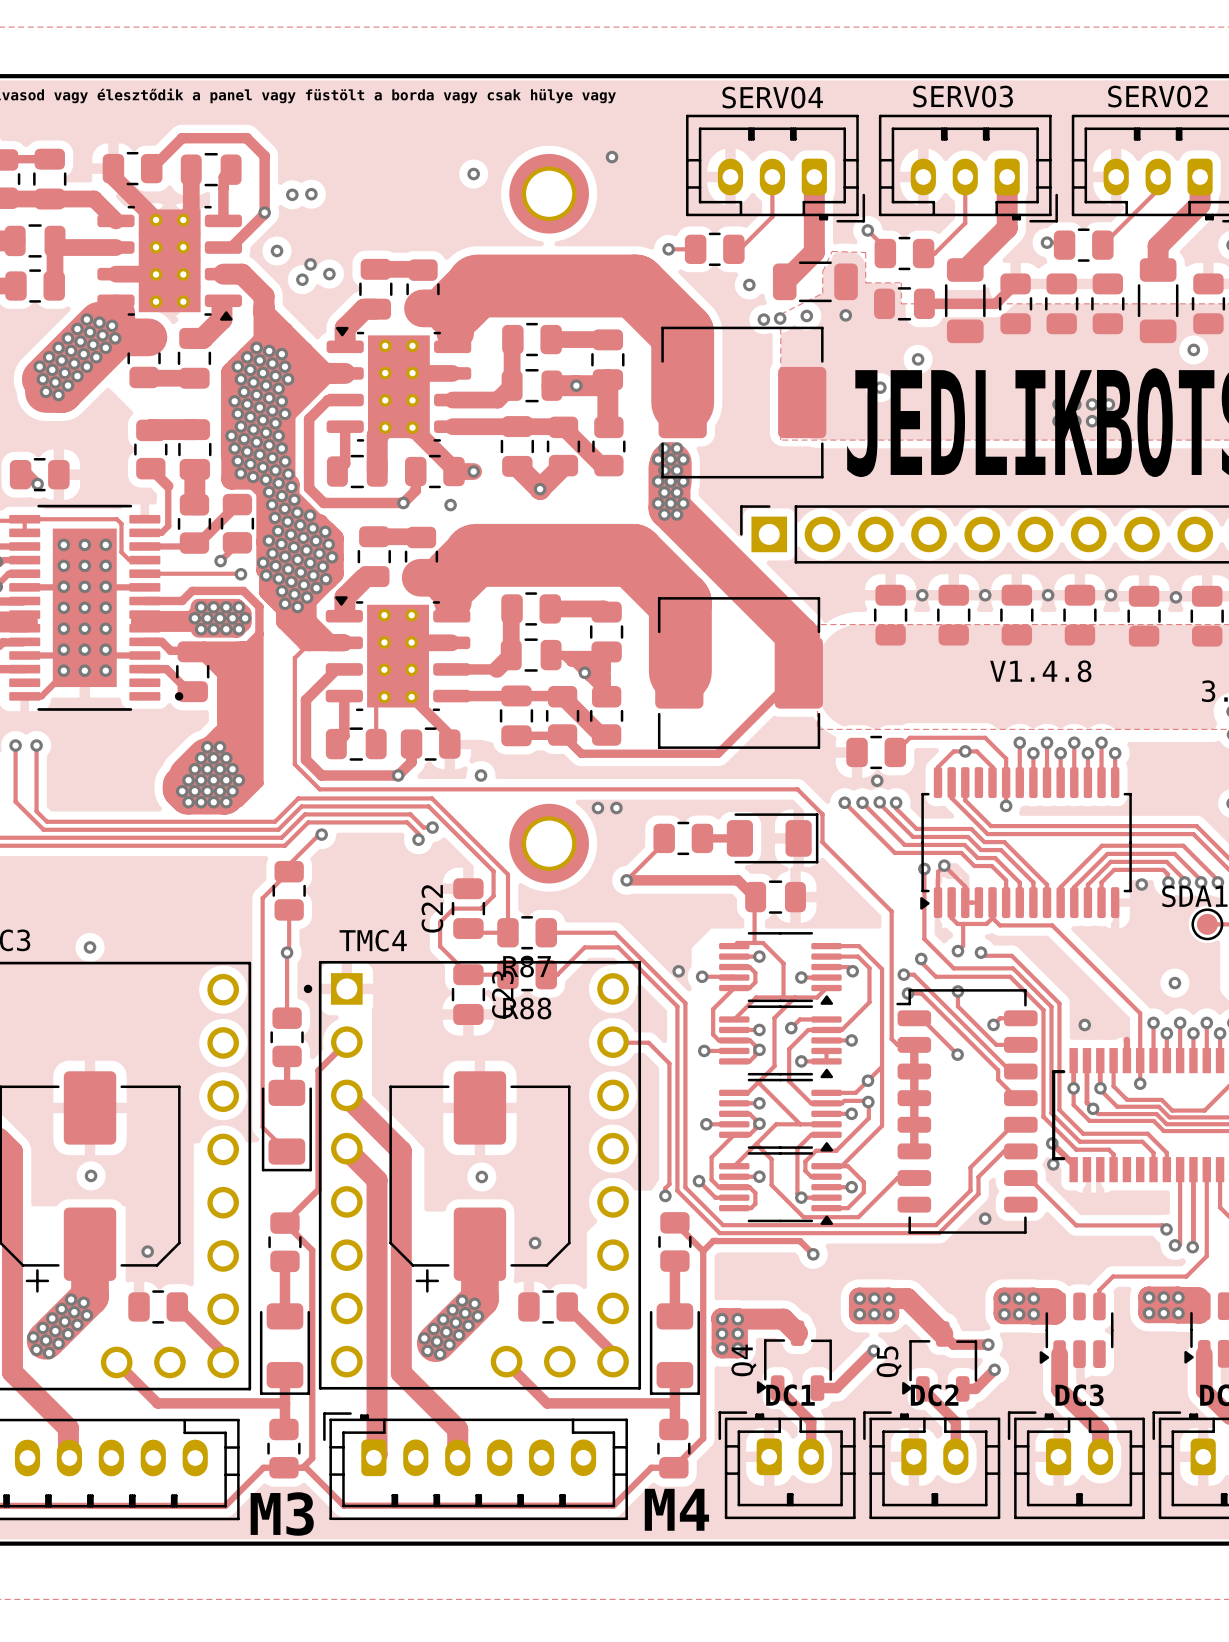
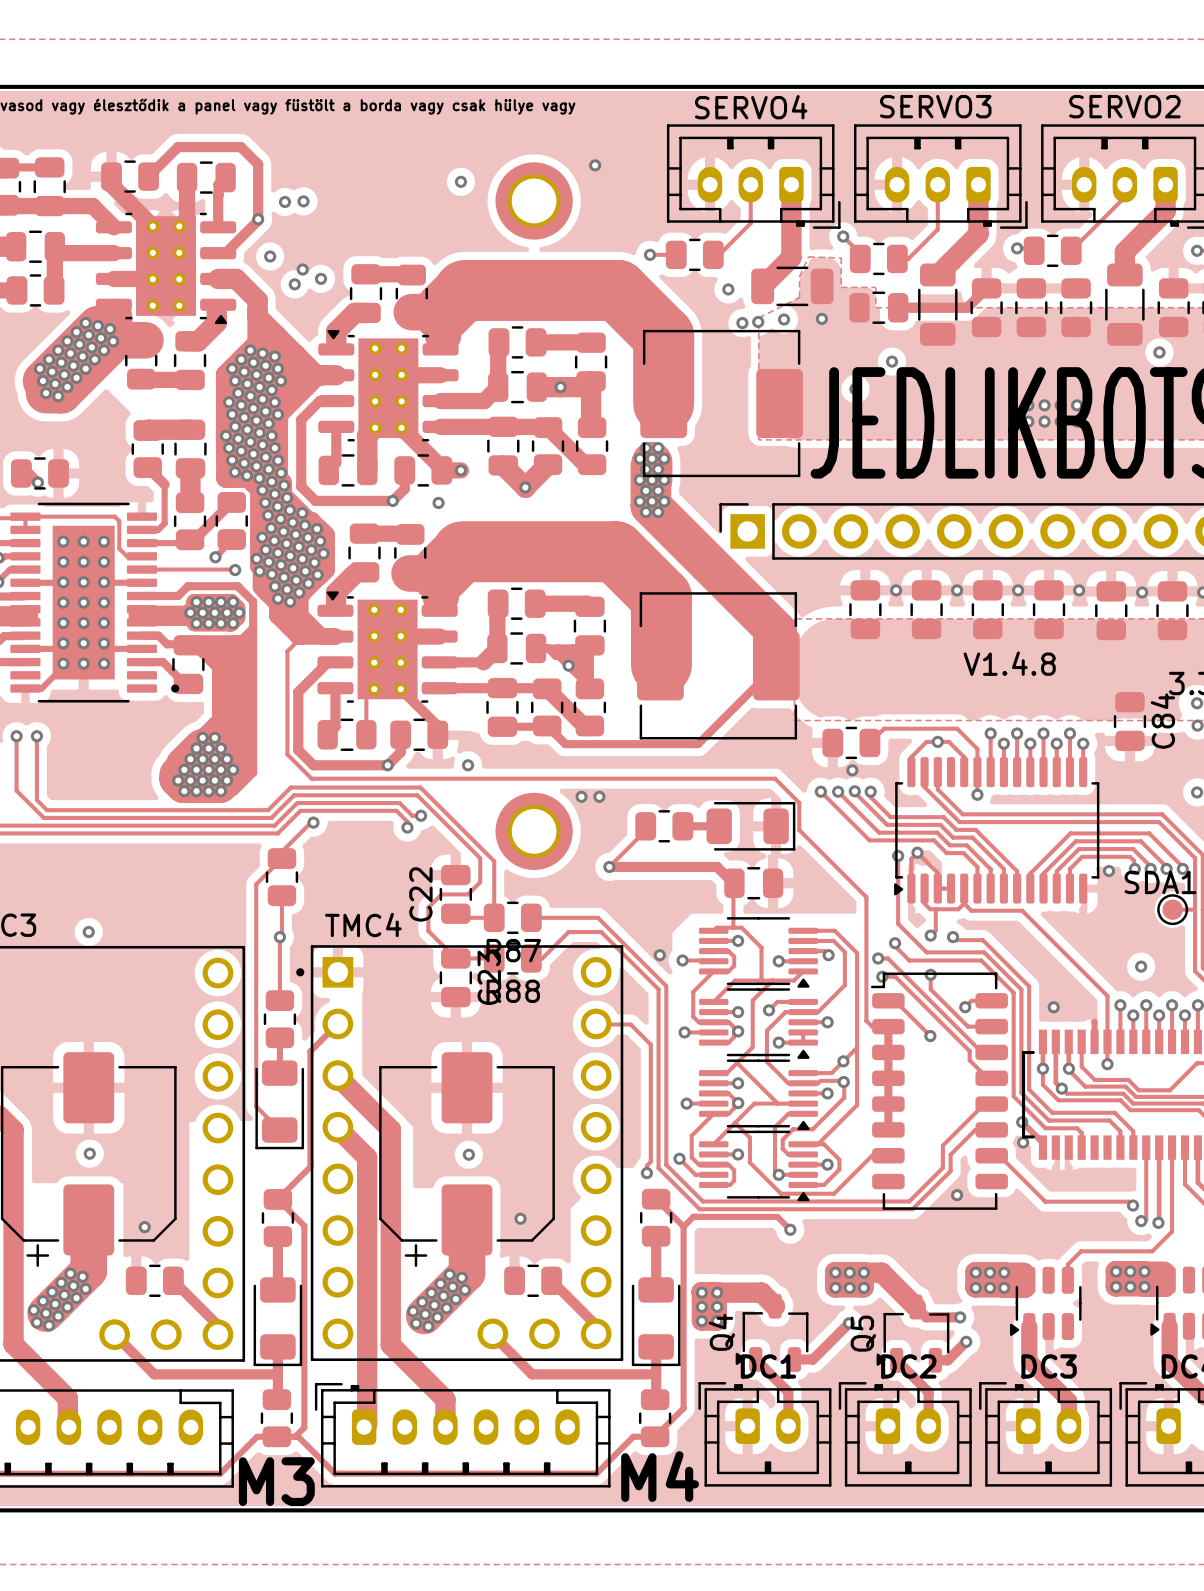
C84: none -> (1129, 721)

